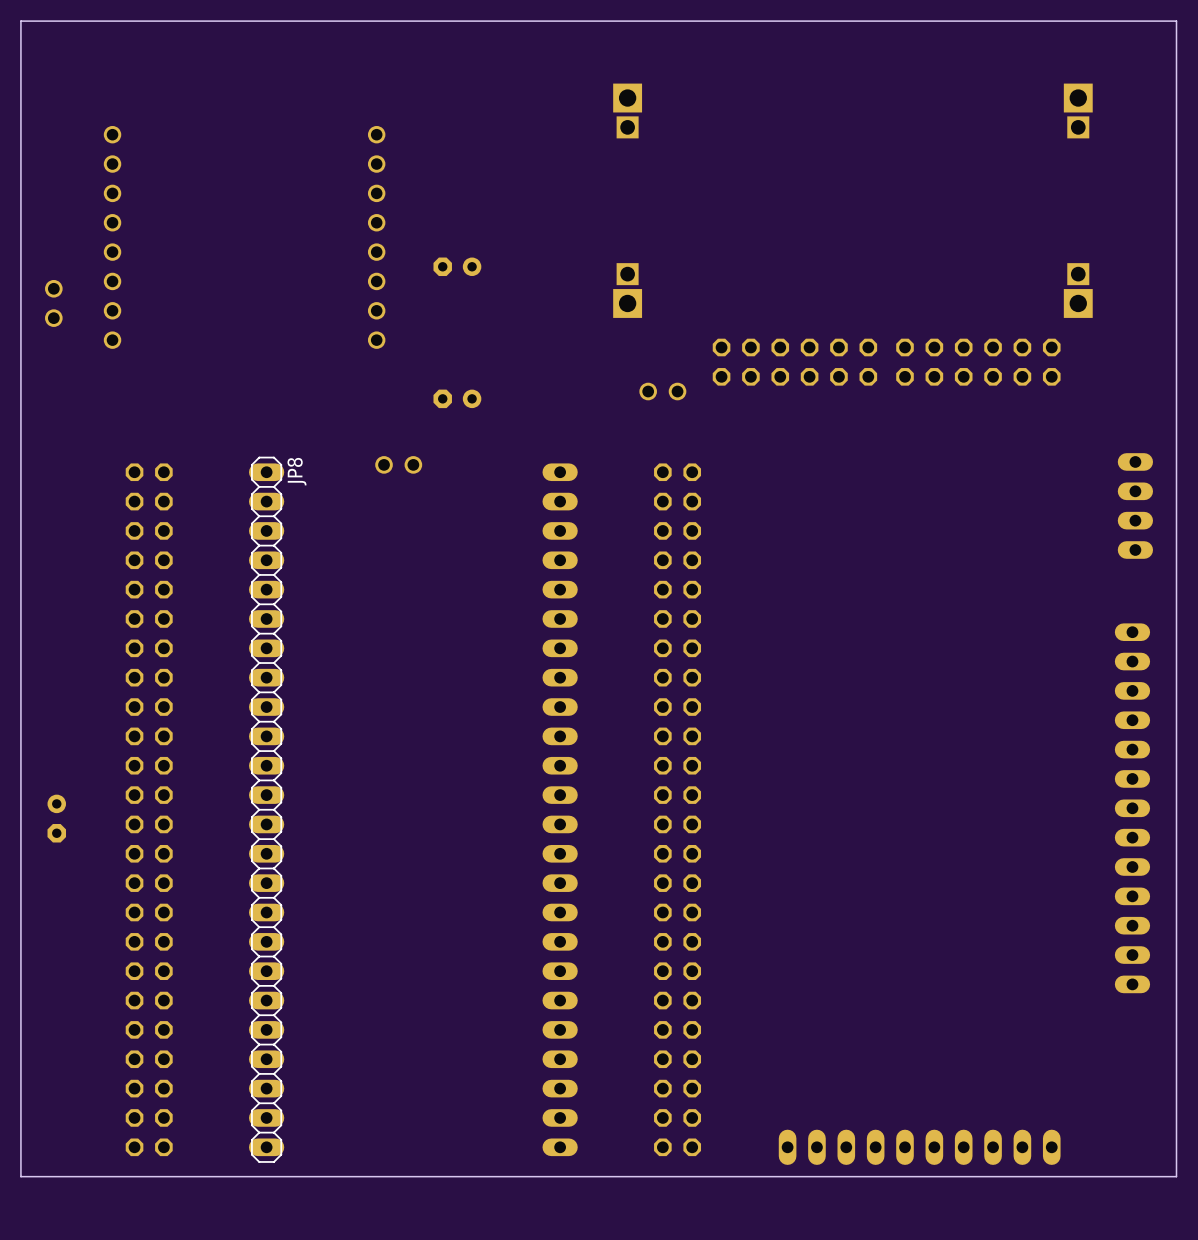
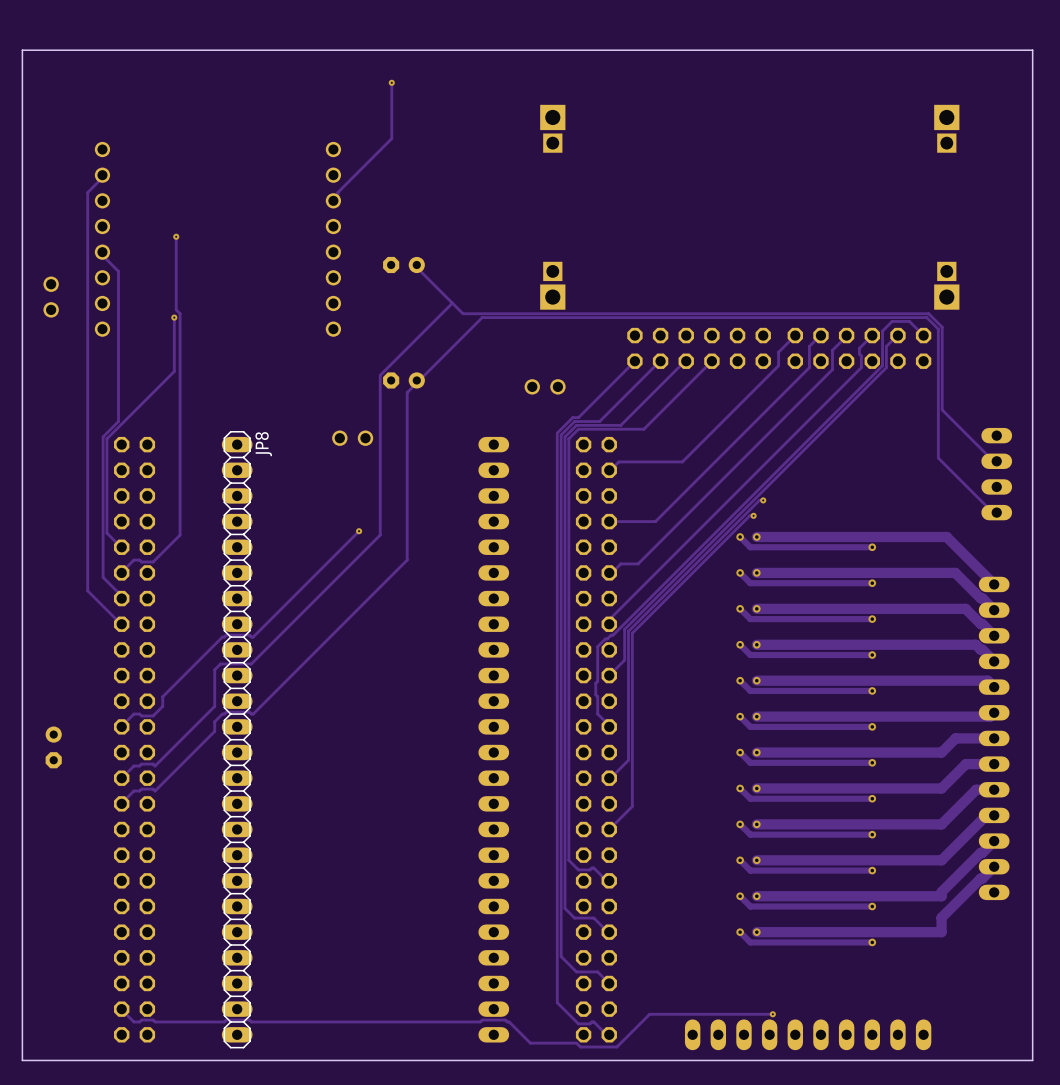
track: none -> (391, 82) (391, 138) (337, 192) (333, 200)
via: none -> (391, 82)
track: none -> (102, 175) (101, 179) (87, 192) (87, 590) (121, 624)
track: none -> (176, 236) (176, 309) (180, 313) (180, 535) (153, 562) (133, 560) (121, 572)
via: none -> (176, 236)
track: none -> (102, 252) (103, 256) (118, 271) (118, 421) (103, 436) (103, 577) (120, 594) (121, 598)
track: none -> (416, 264) (416, 267) (463, 313) (928, 313) (942, 327) (942, 409) (992, 460) (996, 461)
track: none -> (452, 303) (380, 375) (380, 535) (251, 664) (220, 664) (214, 669) (214, 706) (155, 766) (153, 764) (133, 766) (121, 778)
track: none -> (174, 317) (174, 371) (106, 438) (106, 533) (121, 547)
via: none -> (174, 317)
track: none -> (795, 335) (778, 352) (778, 365) (682, 461) (618, 461) (609, 470)
track: none -> (820, 335) (809, 346) (809, 367) (655, 521) (609, 521)
track: none -> (846, 335) (832, 350) (832, 369) (638, 563) (620, 563) (609, 572)
track: none -> (872, 335) (859, 348) (861, 367) (609, 619) (609, 624)
track: none -> (897, 335) (886, 346) (886, 367) (624, 629) (624, 660) (609, 675)
track: none -> (923, 335) (909, 321) (892, 321) (882, 331) (882, 365) (613, 635) (605, 638) (597, 646) (597, 681) (595, 683) (597, 714) (609, 726)
track: none -> (634, 361) (578, 417) (572, 417) (557, 433) (557, 1002) (578, 1023) (593, 1021) (609, 1034)
track: none -> (660, 361) (599, 421) (574, 421) (561, 434) (561, 956) (576, 971) (597, 971) (609, 983)
track: none -> (686, 361) (620, 425) (576, 425) (565, 436) (565, 908) (574, 918) (593, 918) (609, 932)
track: none -> (711, 361) (643, 429) (578, 429) (568, 438) (568, 860) (578, 869) (593, 868) (609, 880)
part position: (662, 391) -> (545, 386)
track: none -> (763, 500) (759, 500) (628, 631) (628, 760) (609, 778)
via: none -> (763, 500)
track: none -> (996, 512) (992, 511) (938, 458) (938, 329) (926, 317) (482, 317) (420, 379) (416, 379) (416, 383) (407, 392) (407, 560) (253, 714) (249, 712) (226, 712) (222, 714) (214, 721) (214, 731) (155, 791) (153, 789) (133, 791) (121, 803)
track: none -> (753, 515) (749, 515) (632, 633) (632, 806) (609, 829)
via: none -> (753, 515)
track: none -> (359, 531) (253, 637) (249, 635) (226, 635) (222, 637) (162, 696) (162, 706) (153, 715) (133, 714) (121, 726)
via: none -> (359, 531)
track: none -> (740, 536) (750, 547) (872, 547)
via: none -> (740, 536)
track: none -> (756, 536) (946, 536) (994, 584)
via: none -> (756, 536)
via: none -> (872, 547)
track: none -> (740, 572) (750, 583) (872, 583)
via: none -> (740, 572)
track: none -> (756, 572) (955, 572) (994, 610)
via: none -> (756, 572)
via: none -> (872, 583)
track: none -> (740, 608) (750, 619) (872, 619)
via: none -> (740, 608)
track: none -> (756, 608) (965, 608) (994, 635)
via: none -> (756, 608)
via: none -> (872, 619)
track: none -> (740, 644) (750, 655) (872, 655)
via: none -> (740, 644)
track: none -> (756, 644) (975, 644) (994, 661)
via: none -> (756, 644)
via: none -> (872, 655)
track: none -> (740, 680) (750, 690) (872, 690)
via: none -> (740, 680)
track: none -> (756, 680) (987, 680) (994, 687)
via: none -> (756, 680)
via: none -> (872, 690)
track: none -> (994, 712) (990, 716) (756, 716)
track: none -> (740, 716) (750, 726) (872, 726)
via: none -> (740, 716)
via: none -> (756, 716)
via: none -> (872, 726)
track: none -> (994, 738) (955, 738) (941, 752) (756, 752)
track: none -> (740, 752) (750, 762) (872, 762)
via: none -> (740, 752)
via: none -> (756, 752)
via: none -> (872, 762)
track: none -> (994, 764) (965, 764) (941, 788) (756, 788)
track: none -> (740, 788) (750, 798) (872, 798)
via: none -> (740, 788)
via: none -> (756, 788)
track: none -> (994, 789) (976, 789) (941, 824) (756, 824)
via: none -> (872, 798)
track: none -> (994, 815) (986, 815) (941, 860) (756, 860)
track: none -> (740, 824) (750, 834) (872, 834)
via: none -> (740, 824)
via: none -> (756, 824)
via: none -> (872, 834)
track: none -> (994, 841) (941, 892) (941, 896) (756, 896)
track: none -> (740, 860) (750, 870) (872, 870)
via: none -> (740, 860)
via: none -> (756, 860)
track: none -> (994, 866) (941, 917) (941, 932) (756, 932)
via: none -> (872, 870)
track: none -> (740, 896) (750, 906) (872, 906)
via: none -> (740, 896)
via: none -> (756, 896)
via: none -> (872, 906)
track: none -> (740, 932) (750, 942) (872, 942)
via: none -> (740, 932)
via: none -> (756, 932)
via: none -> (872, 942)
track: none -> (121, 1009) (133, 1021) (141, 1020) (153, 1020) (155, 1021) (224, 1021) (226, 1020) (249, 1020) (251, 1021) (480, 1021) (482, 1020) (505, 1020) (530, 1043) (576, 1043) (580, 1046) (616, 1046) (649, 1014) (772, 1014)
via: none -> (772, 1014)

